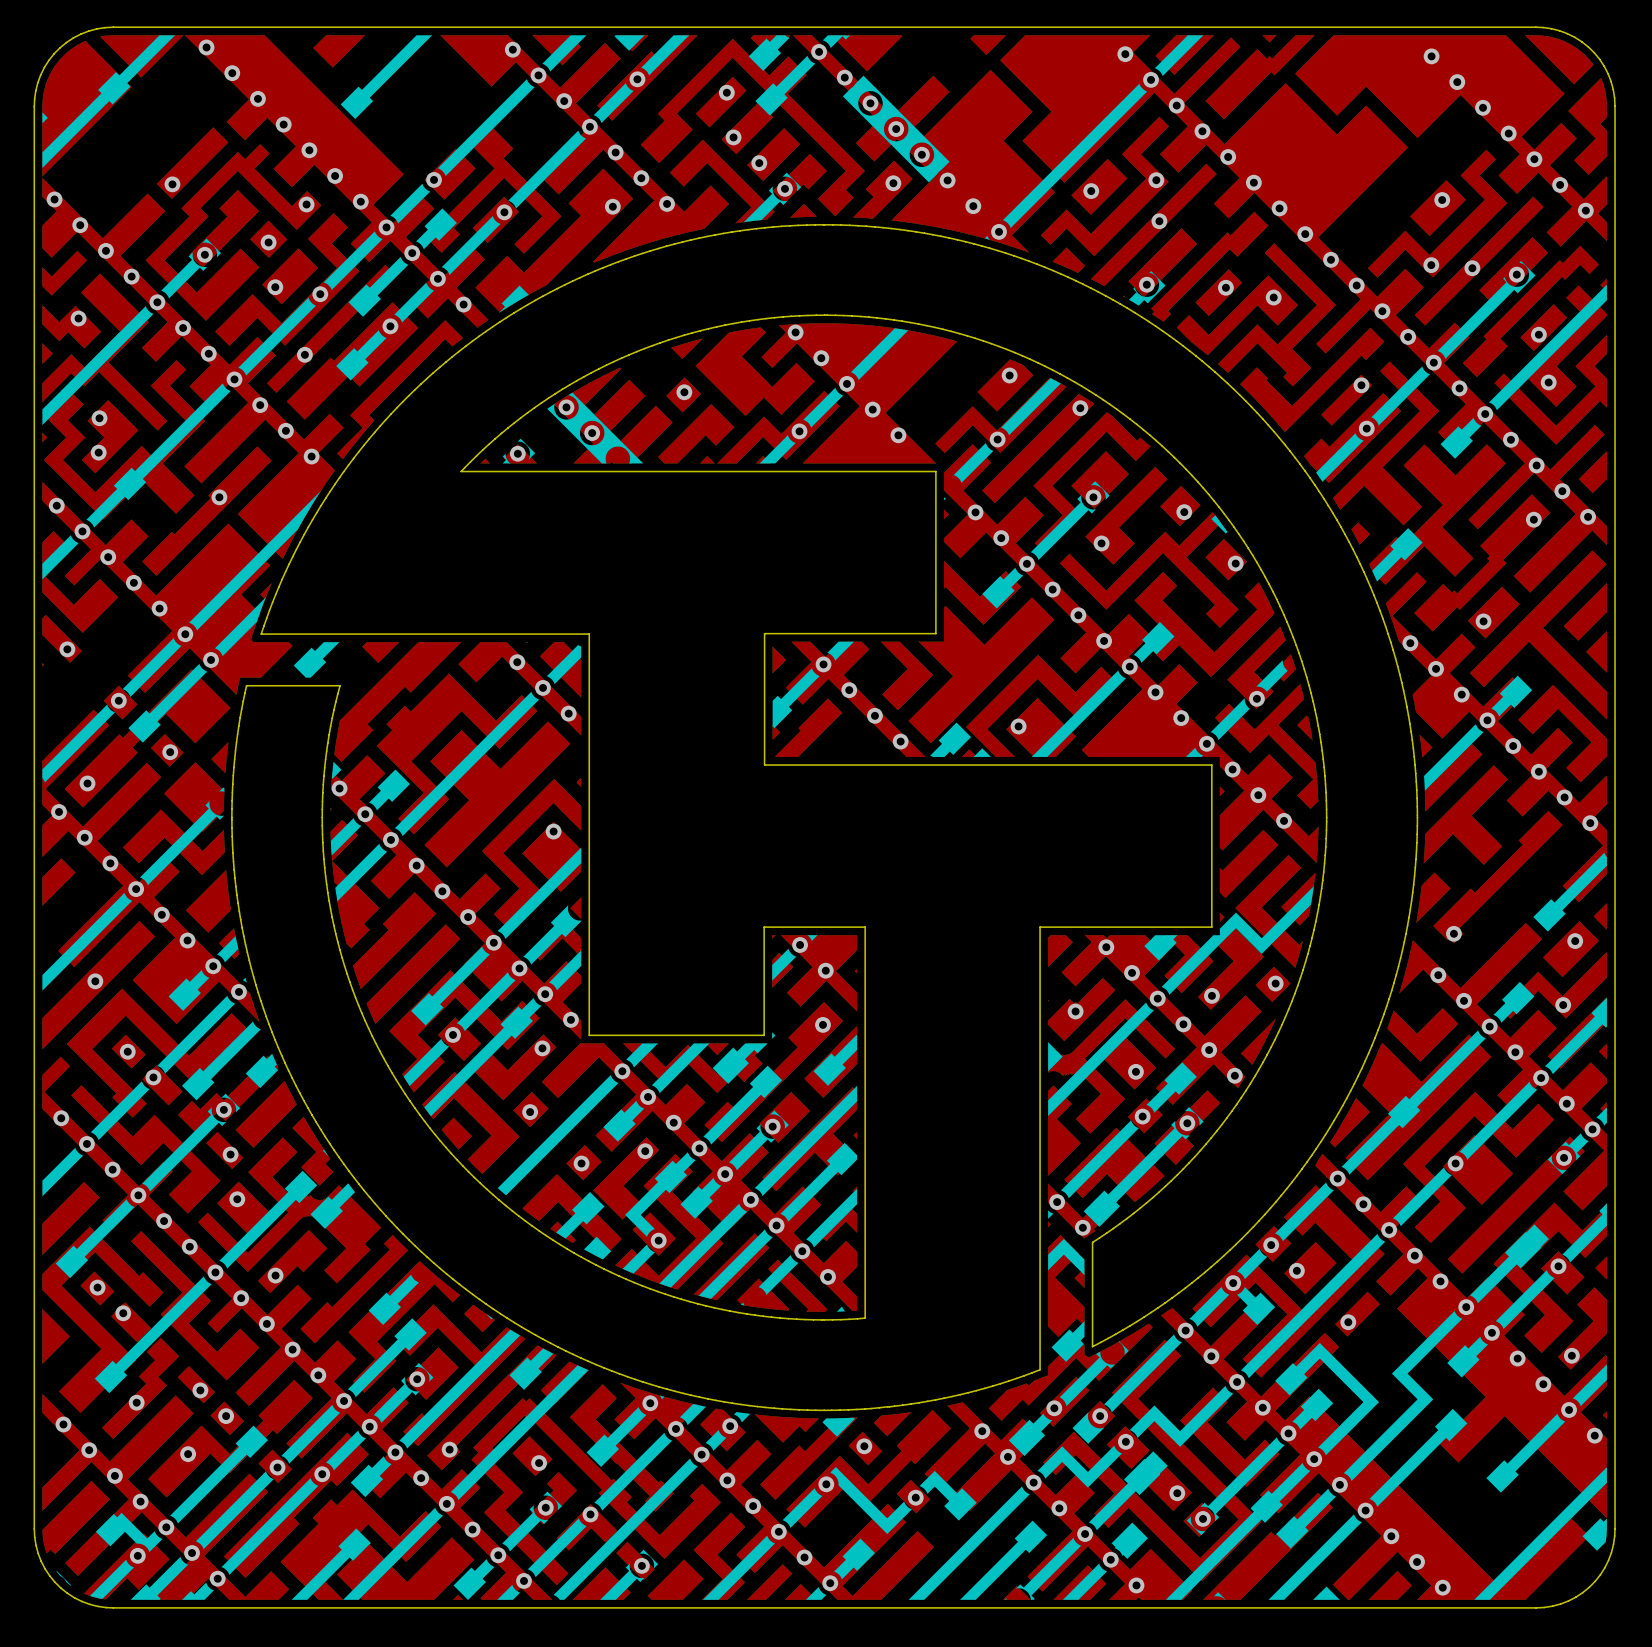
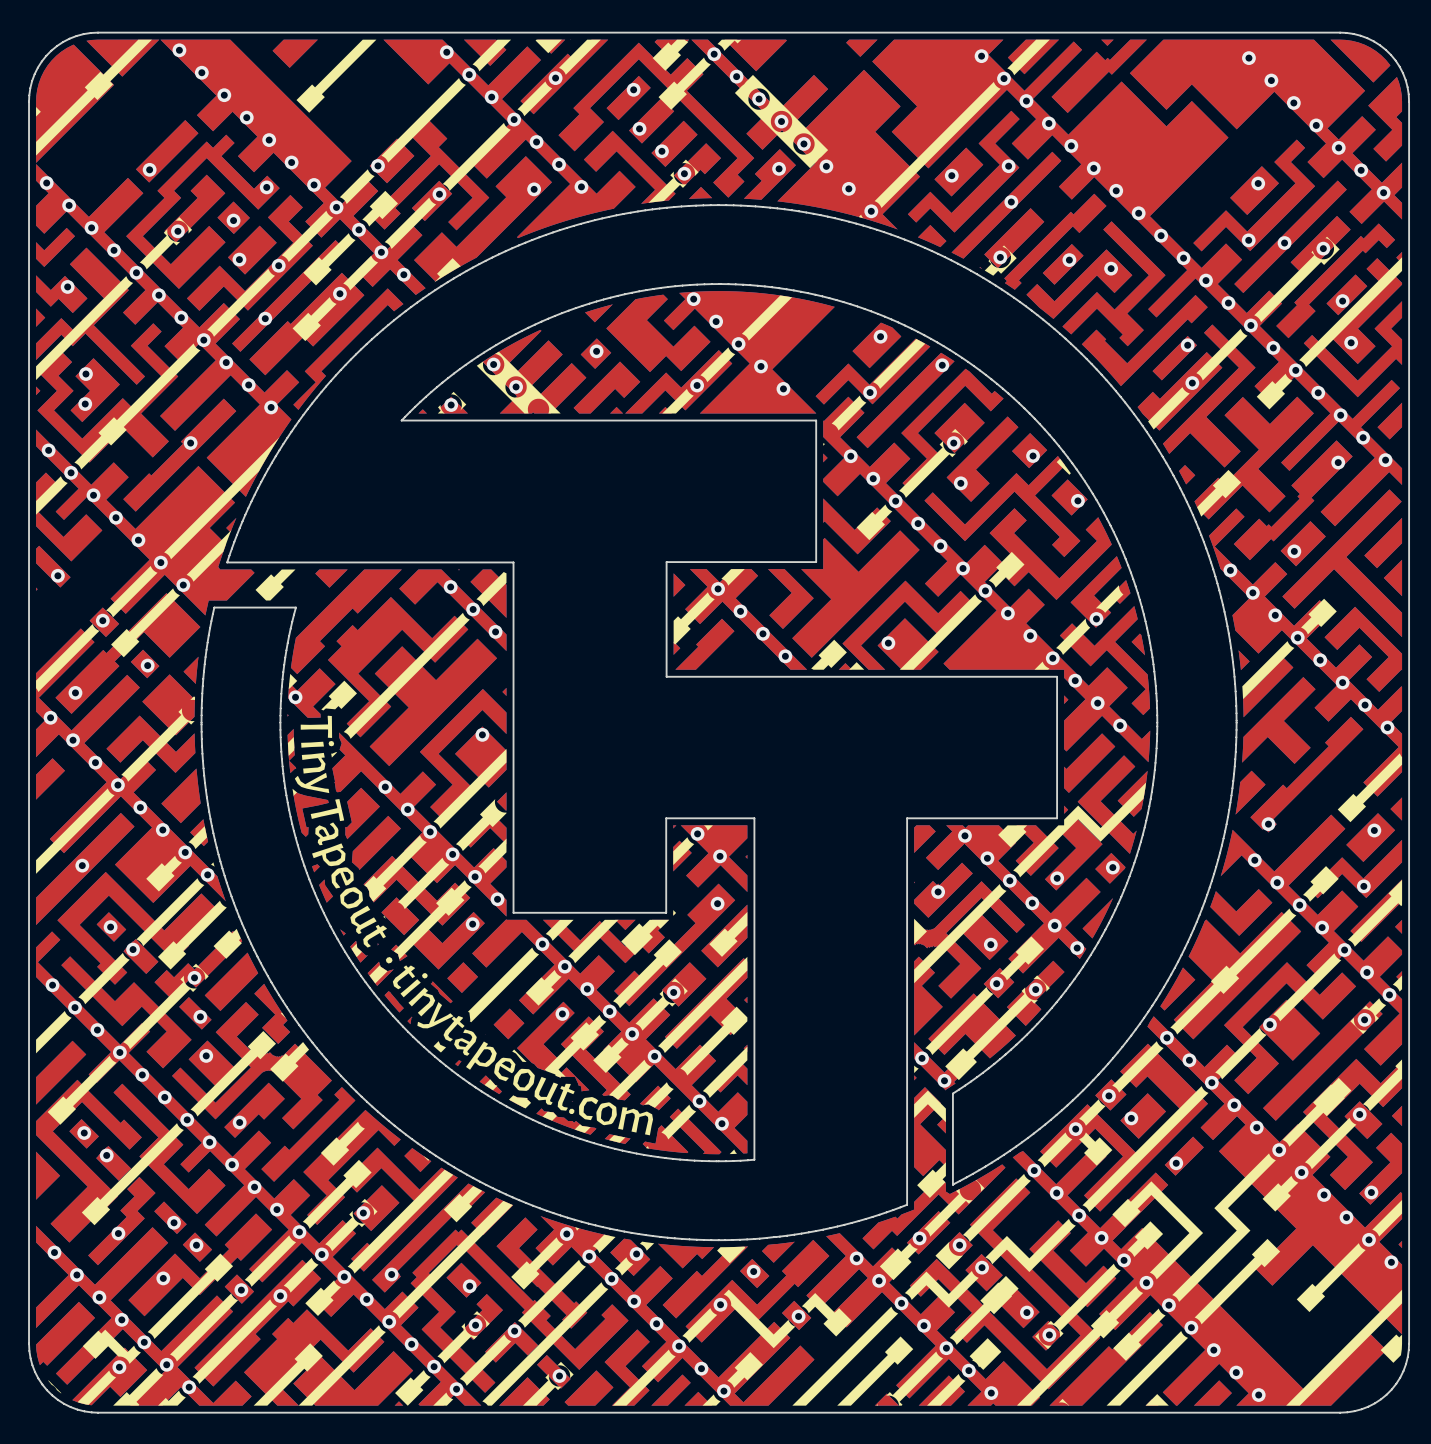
drawing: [330, 755, 790, 1311] -> none
drawing: none -> [287, 668, 689, 1154]
drawing shape: [369, 769, 410, 811] -> [321, 680, 358, 711]
via: (365, 814) -> none
via: (390, 839) -> none
via: (416, 865) -> none
drawing shape: [411, 946, 491, 1026] -> [364, 835, 427, 902]
via: (453, 1034) -> none
drawing shape: [403, 1038, 450, 1087] -> [363, 924, 387, 948]
via: (530, 1112) -> none
drawing shape: [625, 1152, 696, 1237] -> [544, 1014, 607, 1078]
via: (581, 1163) -> none
drawing shape: [556, 1192, 605, 1239] -> [494, 1057, 516, 1082]
via: (776, 1225) -> none
via: (658, 1240) -> none

